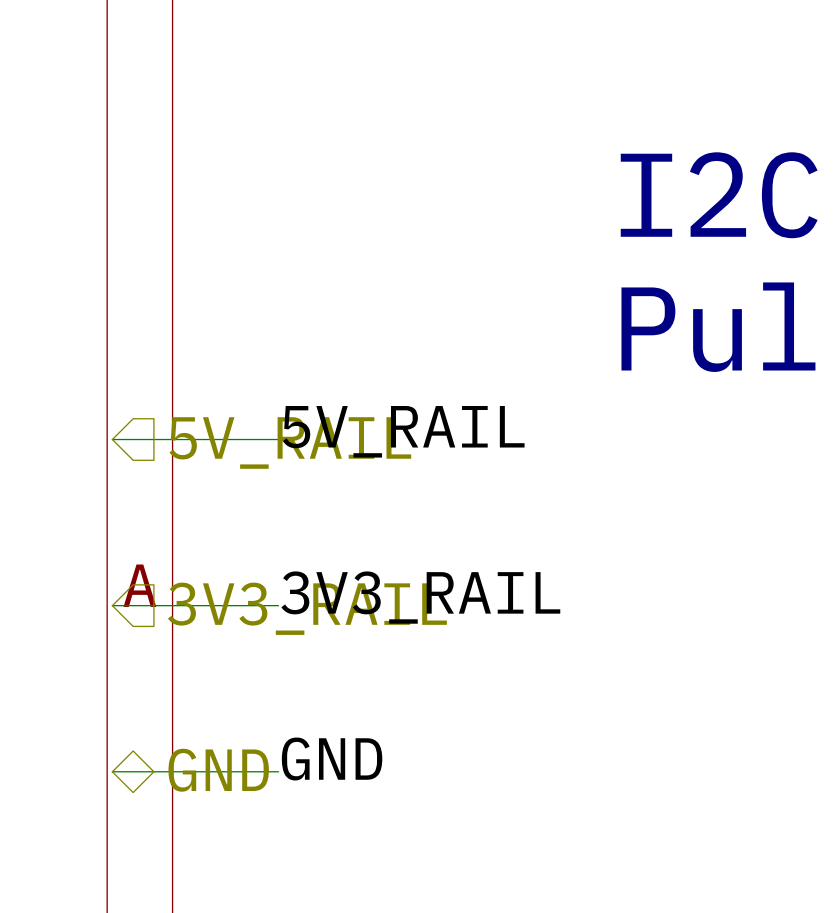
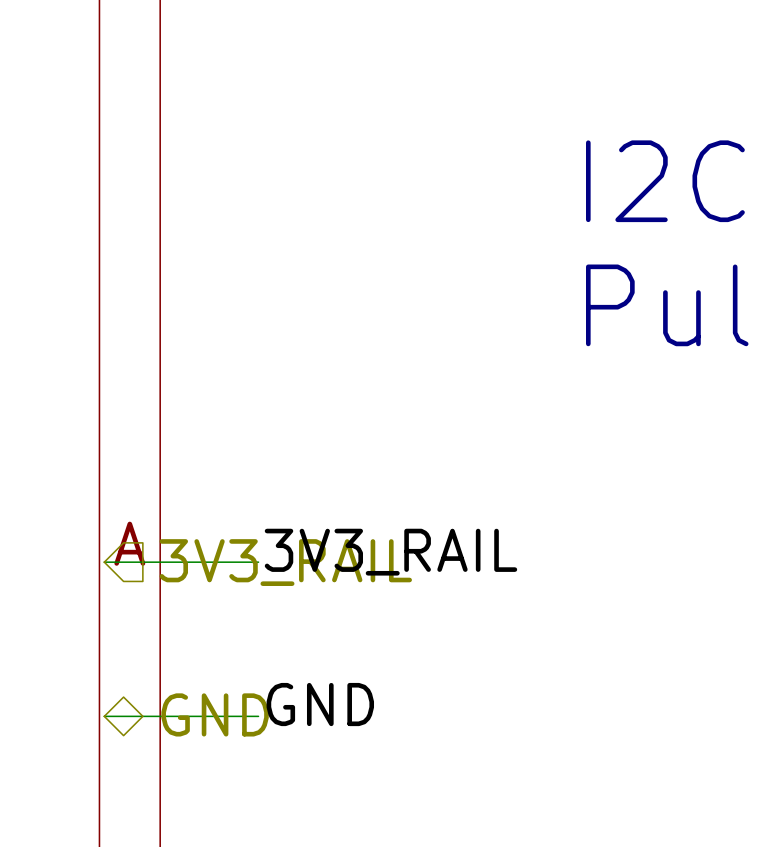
label: 5V_RAIL (403, 431) -> none
wire: (112, 439) (278, 439) -> none
hierarchical label: 5V_RAIL (290, 443) -> none

